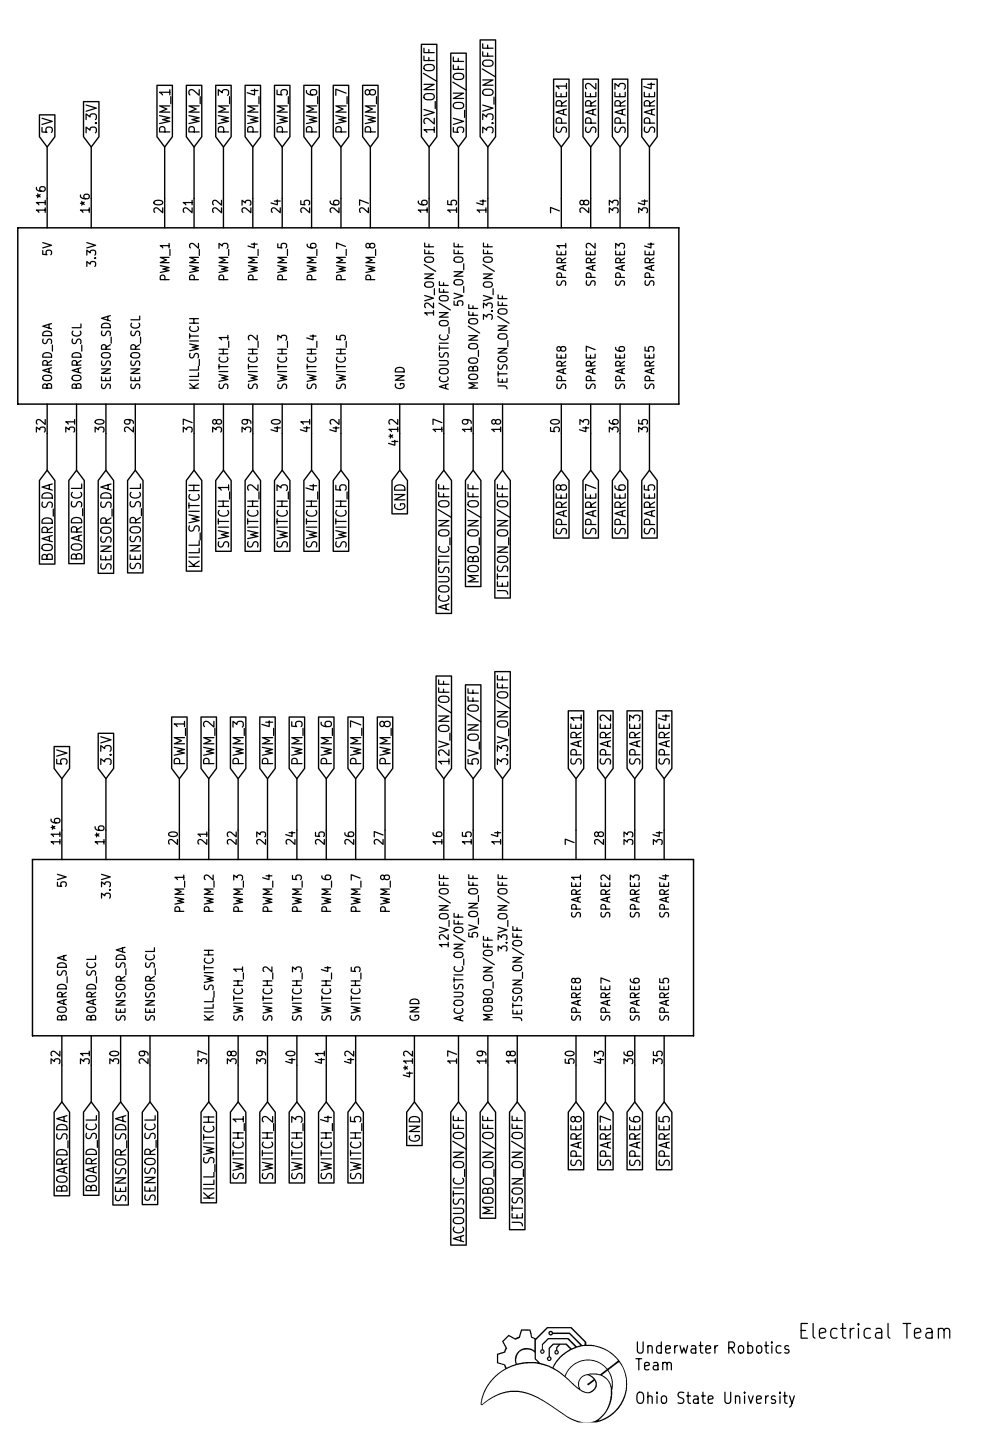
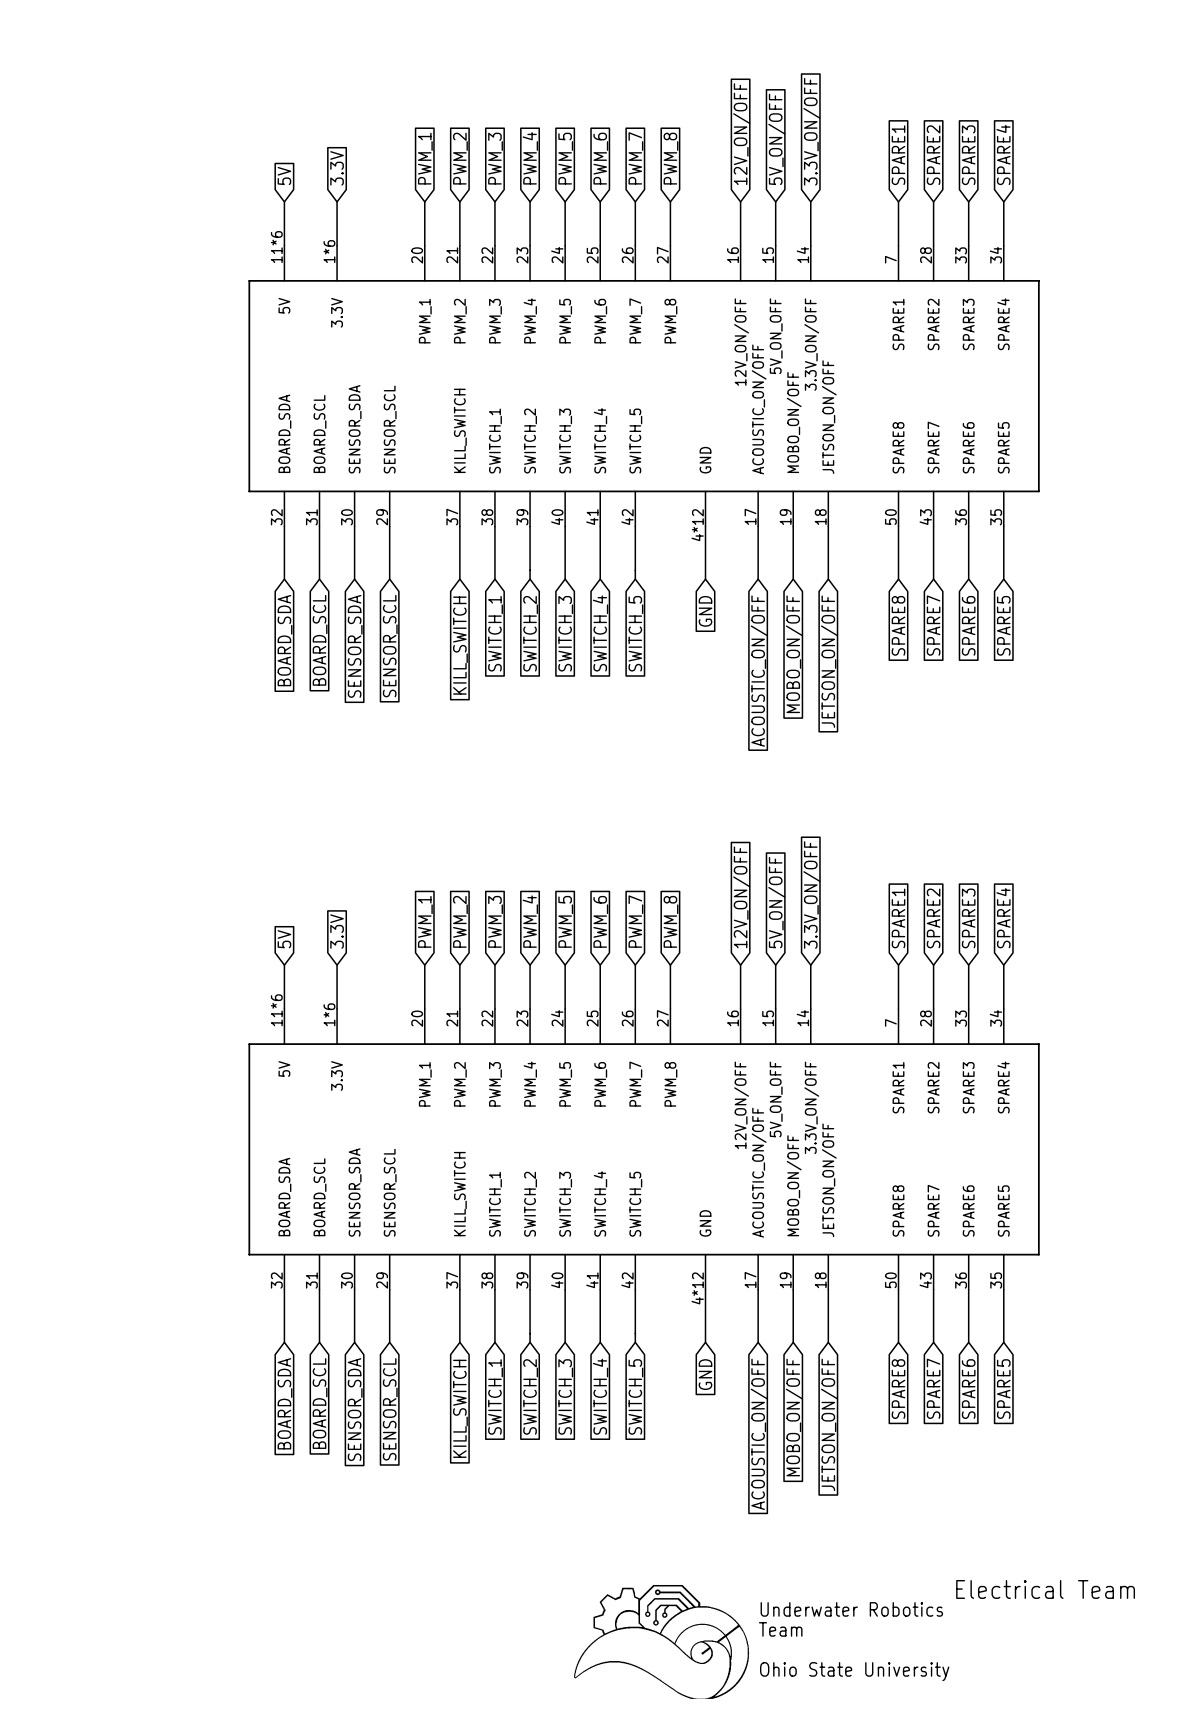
global label: 3.3V_ON/OFF (488, 88) -> none
global label: 12V_ON/OFF (430, 90) -> none
global label: 5V_ON/OFF (459, 94) -> none
global label: SPARE1 (561, 107) -> none
global label: SPARE2 (590, 107) -> none
global label: SPARE3 (620, 107) -> none
global label: SPARE4 (649, 107) -> none
global label: PWM_1 (165, 110) -> none
global label: PWM_2 (194, 110) -> none
global label: PWM_3 (223, 110) -> none
global label: PWM_4 (253, 110) -> none
global label: PWM_5 (282, 110) -> none
global label: PWM_6 (312, 110) -> none
global label: PWM_7 (341, 110) -> none
global label: PWM_8 (370, 110) -> none
global label: none -> 3.3V_ON/OFF (811, 131)
global label: none -> 12V_ON/OFF (741, 134)
global label: none -> 5V_ON/OFF (776, 139)
global label: 3.3V (91, 118) -> none
global label: 5V (47, 125) -> none
global label: none -> SPARE1 (898, 155)
global label: none -> SPARE2 (933, 155)
global label: none -> SPARE3 (968, 155)
global label: none -> SPARE4 (1003, 154)
global label: none -> PWM_1 (425, 158)
global label: none -> PWM_2 (460, 158)
global label: none -> PWM_3 (495, 158)
global label: none -> PWM_4 (530, 158)
global label: none -> PWM_5 (565, 158)
global label: none -> PWM_6 (600, 158)
global label: none -> PWM_7 (635, 158)
global label: none -> PWM_8 (670, 158)
global label: none -> 3.3V (337, 168)
wire: (47, 147) (47, 198) -> none
wire: (91, 147) (91, 198) -> none
wire: (164, 147) (164, 198) -> none
wire: (194, 147) (194, 198) -> none
wire: (223, 147) (223, 198) -> none
global label: none -> 5V (284, 176)
wire: (252, 147) (252, 198) -> none
wire: (282, 147) (282, 169) -> none
wire: (311, 147) (311, 198) -> none
wire: (340, 147) (340, 198) -> none
wire: (370, 147) (370, 198) -> none
wire: (429, 147) (429, 198) -> none
wire: (458, 147) (458, 198) -> none
wire: (487, 147) (487, 198) -> none
wire: (561, 147) (561, 169) -> none
wire: (590, 147) (590, 198) -> none
wire: (620, 147) (620, 169) -> none
wire: (649, 147) (649, 169) -> none
wire: none -> (284, 201) (284, 245)
wire: none -> (424, 201) (424, 245)
wire: none -> (459, 201) (459, 245)
wire: none -> (494, 201) (494, 245)
wire: none -> (530, 201) (530, 245)
wire: none -> (565, 201) (565, 245)
wire: none -> (600, 201) (600, 245)
wire: none -> (635, 201) (635, 245)
wire: none -> (810, 201) (810, 245)
wire: none -> (898, 201) (898, 245)
wire: none -> (933, 201) (933, 245)
wire: none -> (968, 201) (968, 245)
wire: none -> (1003, 201) (1003, 245)
part: (348, 315) -> none
part: none -> (644, 386)
wire: (47, 433) (47, 470) -> none
wire: (76, 433) (76, 470) -> none
wire: (105, 433) (105, 470) -> none
wire: (135, 433) (135, 470) -> none
wire: (194, 433) (194, 470) -> none
wire: (223, 433) (223, 470) -> none
wire: (252, 433) (252, 470) -> none
wire: (282, 433) (282, 470) -> none
wire: (311, 433) (311, 470) -> none
wire: (340, 433) (340, 470) -> none
wire: (399, 433) (399, 470) -> none
wire: (561, 433) (561, 470) -> none
wire: (620, 433) (620, 470) -> none
wire: (649, 433) (649, 470) -> none
wire: none -> (284, 526) (284, 579)
wire: none -> (319, 526) (319, 579)
wire: none -> (354, 526) (354, 579)
wire: none -> (389, 526) (389, 579)
wire: none -> (459, 526) (459, 579)
wire: none -> (494, 526) (494, 579)
wire: none -> (635, 526) (635, 579)
wire: none -> (758, 526) (758, 579)
wire: none -> (793, 526) (793, 579)
wire: none -> (828, 526) (828, 579)
wire: none -> (898, 526) (898, 579)
wire: none -> (933, 526) (933, 579)
wire: none -> (968, 526) (968, 579)
wire: none -> (1003, 526) (1003, 579)
wire: none -> (530, 561) (530, 579)
wire: none -> (565, 561) (565, 579)
wire: none -> (600, 561) (600, 579)
wire: none -> (705, 561) (705, 579)
global label: GND (399, 497) -> none
global label: SPARE8 (561, 509) -> none
global label: SPARE7 (590, 509) -> none
global label: SPARE6 (620, 509) -> none
global label: SPARE5 (649, 509) -> none
global label: none -> GND (705, 611)
global label: SWITCH_1 (223, 515) -> none
global label: SWITCH_2 (253, 515) -> none
global label: SWITCH_3 (282, 515) -> none
global label: SWITCH_4 (311, 515) -> none
global label: SWITCH_5 (341, 515) -> none
global label: BOARD_SDA (47, 521) -> none
global label: BOARD_SCL (77, 521) -> none
global label: none -> SPARE7 (933, 625)
global label: none -> SPARE8 (898, 625)
global label: none -> SPARE6 (968, 625)
global label: none -> SPARE5 (1003, 625)
global label: KILL_SWITCH (194, 525) -> none
global label: SENSOR_SDA (106, 526) -> none
global label: SENSOR_SCL (135, 526) -> none
global label: none -> SWITCH_1 (495, 633)
global label: none -> SWITCH_2 (530, 633)
global label: none -> SWITCH_3 (565, 633)
global label: none -> SWITCH_4 (600, 633)
global label: none -> SWITCH_5 (635, 633)
global label: MOBO_ON/OFF (474, 533) -> none
global label: none -> BOARD_SDA (284, 640)
global label: none -> BOARD_SCL (320, 640)
global label: JETSON_ON/OFF (503, 539) -> none
global label: none -> SENSOR_SCL (390, 646)
global label: none -> KILL_SWITCH (460, 645)
global label: none -> SENSOR_SDA (355, 646)
global label: ACOUSTIC_ON/OFF (444, 547) -> none
global label: none -> MOBO_ON/OFF (794, 654)
global label: none -> JETSON_ON/OFF (829, 661)
global label: none -> ACOUSTIC_ON/OFF (759, 671)
global label: 3.3V_ON/OFF (503, 719) -> none
global label: 12V_ON/OFF (444, 721) -> none
global label: 5V_ON/OFF (474, 726) -> none
global label: SPARE1 (576, 739) -> none
global label: SPARE2 (605, 739) -> none
global label: SPARE3 (634, 739) -> none
global label: SPARE4 (663, 739) -> none
global label: PWM_1 (179, 742) -> none
global label: PWM_2 (209, 742) -> none
global label: PWM_3 (238, 742) -> none
global label: PWM_4 (267, 742) -> none
global label: PWM_5 (297, 742) -> none
global label: PWM_6 (326, 742) -> none
global label: PWM_7 (356, 742) -> PWM_1 (425, 921)
global label: PWM_8 (385, 742) -> PWM_2 (460, 921)
global label: none -> 3.3V_ON/OFF (811, 895)
global label: 3.3V (105, 750) -> none
global label: none -> 12V_ON/OFF (741, 897)
global label: none -> 5V_ON/OFF (776, 902)
global label: 5V (61, 757) -> none
global label: none -> SPARE1 (898, 918)
global label: none -> SPARE2 (933, 918)
global label: none -> SPARE3 (968, 918)
global label: none -> SPARE4 (1003, 918)
global label: none -> PWM_3 (495, 921)
global label: none -> PWM_4 (530, 921)
global label: none -> PWM_5 (565, 921)
global label: none -> PWM_6 (600, 921)
global label: none -> PWM_7 (635, 921)
global label: none -> PWM_8 (670, 921)
wire: (61, 778) (61, 830) -> none
wire: (105, 778) (105, 830) -> none
wire: (179, 778) (179, 830) -> none
wire: (208, 778) (208, 830) -> none
wire: (238, 778) (238, 808) -> none
wire: (267, 778) (267, 830) -> none
wire: (296, 778) (296, 830) -> none
wire: (326, 778) (326, 830) -> none
wire: (355, 778) (355, 808) -> none
wire: (385, 778) (385, 808) -> none
wire: (443, 778) (443, 808) -> none
wire: (473, 778) (473, 808) -> none
wire: (502, 778) (502, 808) -> none
wire: (576, 778) (576, 830) -> none
wire: (605, 778) (605, 830) -> none
wire: (634, 778) (634, 830) -> none
wire: (664, 778) (664, 830) -> none
global label: none -> 3.3V (337, 931)
global label: none -> 5V (284, 939)
wire: none -> (337, 965) (337, 1009)
wire: none -> (494, 965) (494, 1009)
wire: none -> (635, 965) (635, 1009)
wire: none -> (670, 965) (670, 1009)
wire: none -> (740, 965) (740, 1009)
wire: none -> (775, 965) (775, 1009)
wire: none -> (810, 965) (810, 1009)
wire: none -> (898, 965) (898, 1009)
wire: none -> (933, 965) (933, 1009)
wire: none -> (968, 965) (968, 1009)
wire: none -> (1003, 965) (1003, 1009)
part: (362, 947) -> none
part: none -> (644, 1149)
wire: (61, 1065) (61, 1101) -> none
wire: (91, 1065) (91, 1101) -> none
wire: (120, 1065) (120, 1101) -> none
wire: (149, 1065) (149, 1101) -> none
wire: (208, 1065) (208, 1101) -> none
wire: (355, 1065) (355, 1101) -> none
wire: (458, 1065) (458, 1101) -> none
wire: (487, 1065) (487, 1101) -> none
wire: (517, 1065) (517, 1101) -> none
wire: (576, 1065) (576, 1101) -> none
wire: (605, 1065) (605, 1101) -> none
wire: none -> (459, 1289) (459, 1342)
wire: none -> (530, 1289) (530, 1342)
wire: none -> (565, 1289) (565, 1342)
wire: none -> (600, 1289) (600, 1342)
wire: none -> (635, 1289) (635, 1342)
wire: none -> (705, 1289) (705, 1342)
wire: none -> (828, 1289) (828, 1342)
wire: none -> (898, 1289) (898, 1342)
wire: none -> (933, 1289) (933, 1342)
wire: none -> (968, 1289) (968, 1342)
wire: none -> (1003, 1289) (1003, 1342)
wire: none -> (284, 1316) (284, 1342)
wire: none -> (319, 1316) (319, 1342)
wire: none -> (354, 1316) (354, 1342)
wire: none -> (389, 1316) (389, 1342)
wire: none -> (494, 1316) (494, 1342)
wire: none -> (758, 1316) (758, 1342)
wire: none -> (793, 1316) (793, 1342)
global label: GND (414, 1128) -> none
global label: SPARE8 (576, 1140) -> none
global label: SPARE7 (605, 1140) -> none
global label: SPARE6 (634, 1140) -> none
global label: SPARE5 (664, 1140) -> none
global label: SWITCH_1 (238, 1147) -> none
global label: SWITCH_2 (268, 1147) -> none
global label: SWITCH_3 (297, 1147) -> none
global label: SWITCH_4 (326, 1147) -> none
global label: SWITCH_5 (356, 1147) -> none
global label: none -> GND (705, 1374)
global label: BOARD_SDA (62, 1153) -> none
global label: BOARD_SCL (91, 1153) -> none
global label: SENSOR_SCL (150, 1157) -> none
global label: KILL_SWITCH (209, 1157) -> none
global label: SENSOR_SDA (121, 1158) -> none
global label: none -> SPARE7 (933, 1388)
global label: none -> SPARE8 (898, 1389)
global label: none -> SPARE6 (968, 1389)
global label: none -> SPARE5 (1003, 1389)
global label: MOBO_ON/OFF (488, 1164) -> none
global label: none -> SWITCH_1 (495, 1396)
global label: none -> SWITCH_2 (530, 1396)
global label: none -> SWITCH_3 (565, 1396)
global label: none -> SWITCH_4 (600, 1396)
global label: none -> SWITCH_5 (635, 1396)
global label: JETSON_ON/OFF (518, 1170) -> none
global label: none -> BOARD_SDA (284, 1403)
global label: none -> BOARD_SCL (320, 1403)
global label: ACOUSTIC_ON/OFF (459, 1178) -> none
global label: none -> SENSOR_SCL (390, 1409)
global label: none -> KILL_SWITCH (460, 1408)
global label: none -> SENSOR_SDA (355, 1409)
global label: none -> MOBO_ON/OFF (794, 1417)
global label: none -> JETSON_ON/OFF (829, 1424)
global label: none -> ACOUSTIC_ON/OFF (759, 1434)

